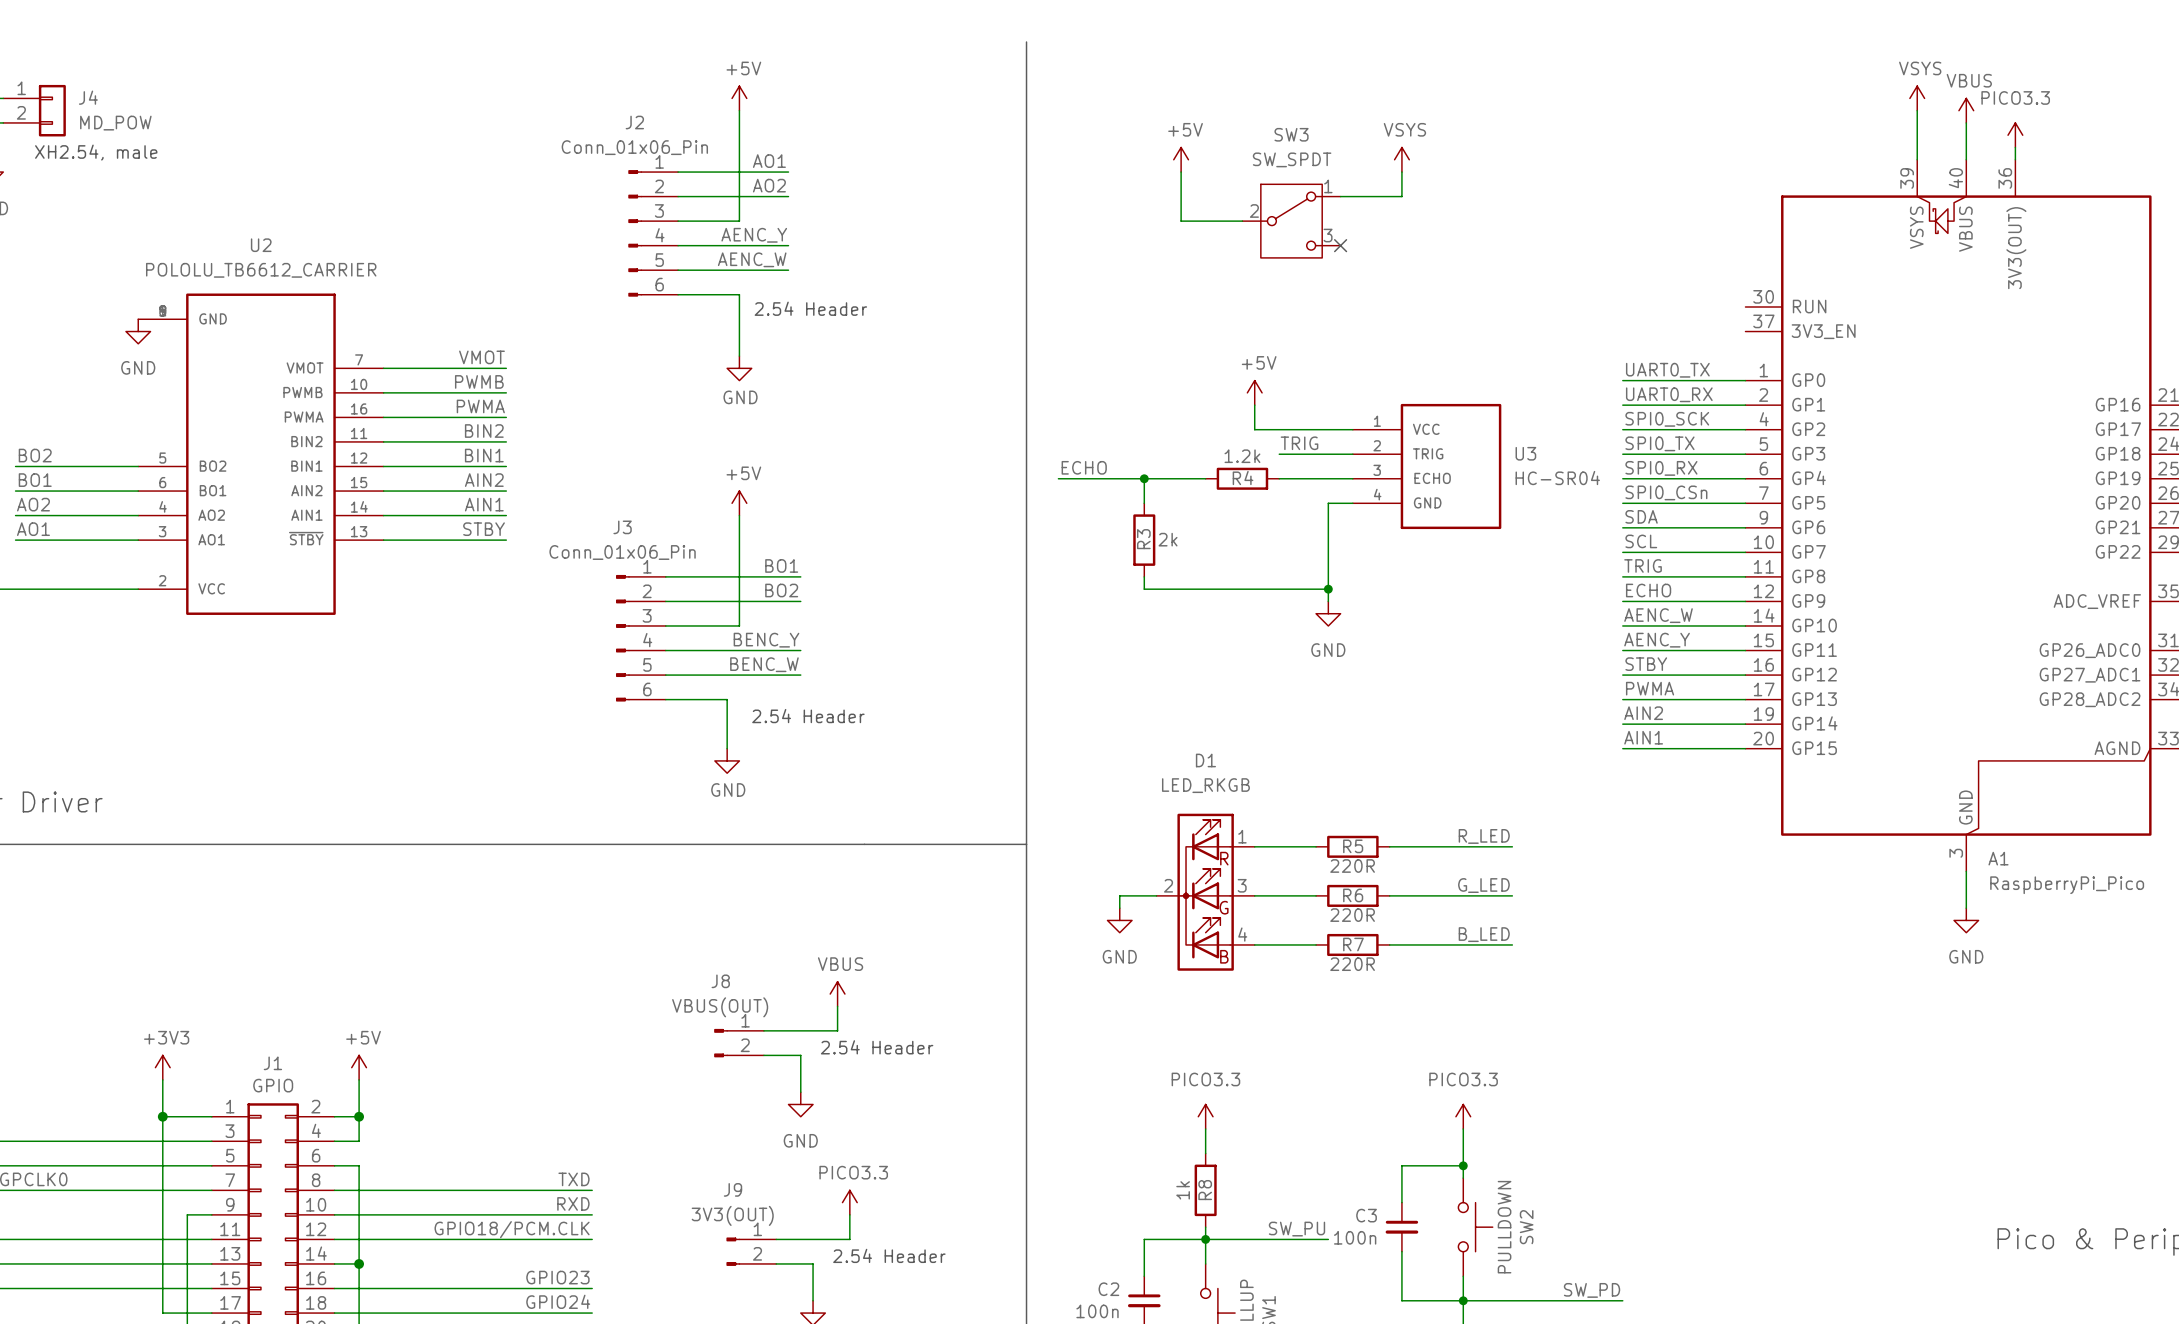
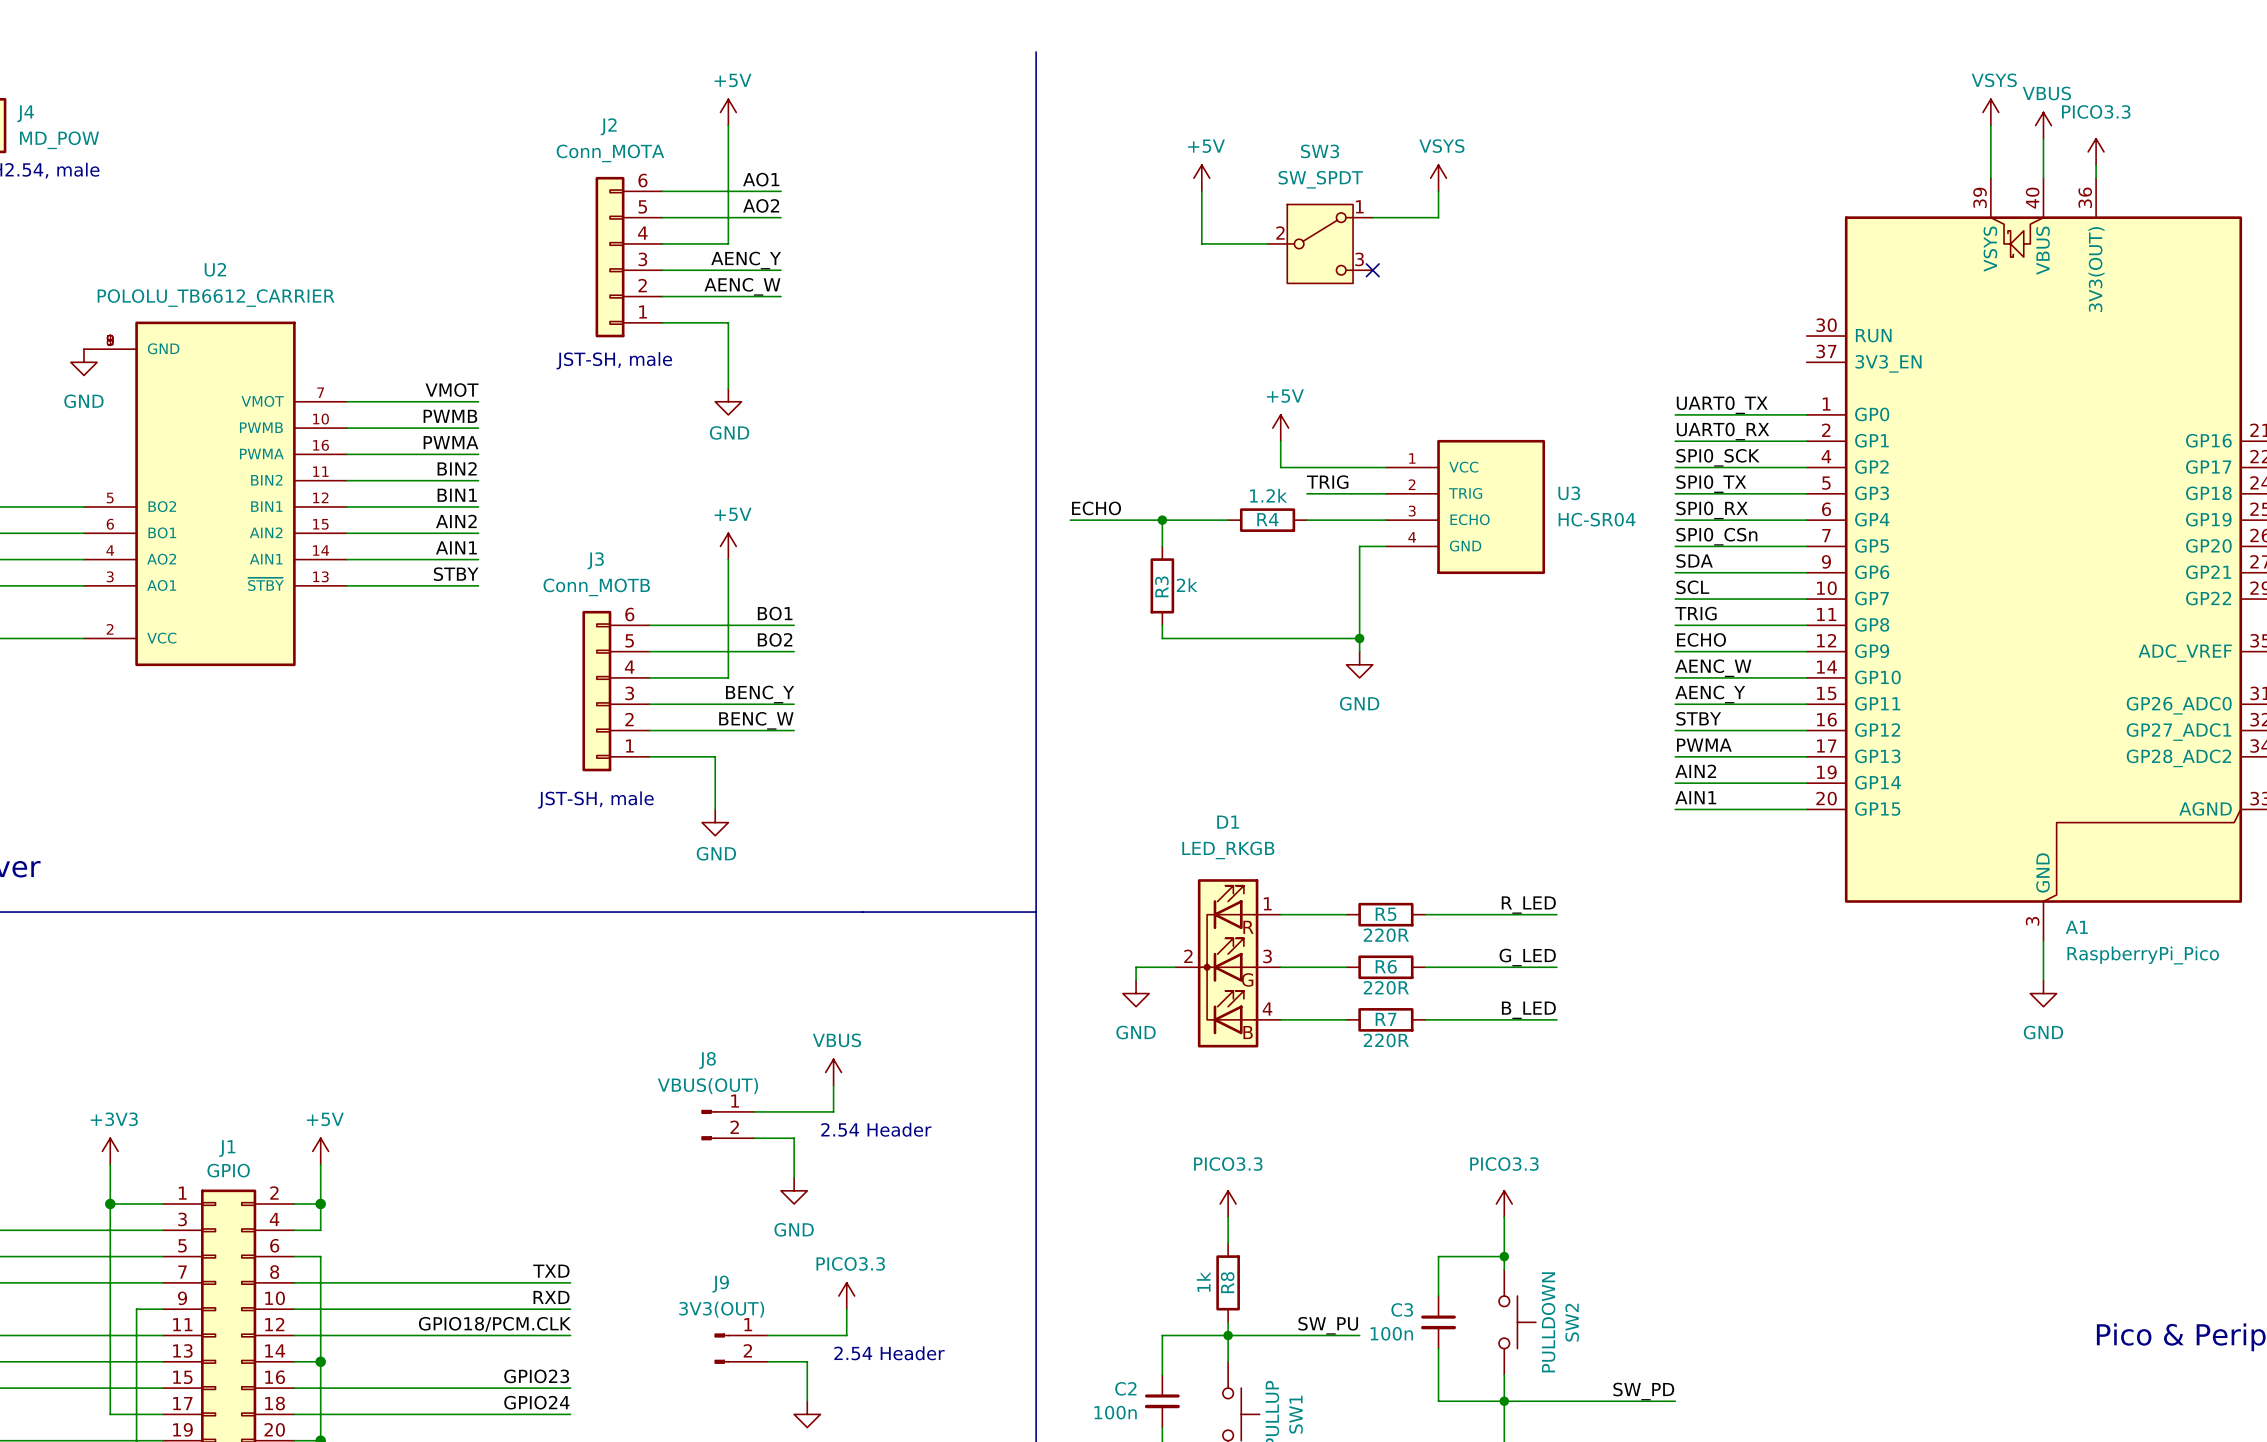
J2 value: Conn_01x06_Pin (634, 147) -> Conn_MOTA (610, 153)
J2 symbol: [628, 170, 679, 297] -> [595, 176, 663, 338]
text: 2.54 Header (810, 308) -> none
text: none -> JST-SH, male (614, 360)
J3 value: Conn_01x06_Pin (622, 552) -> Conn_MOTB (596, 587)
J3 symbol: [616, 574, 666, 702] -> [582, 610, 650, 772]
text: 2.54 Header (808, 716) -> none
text: none -> JST-SH, male (595, 800)

